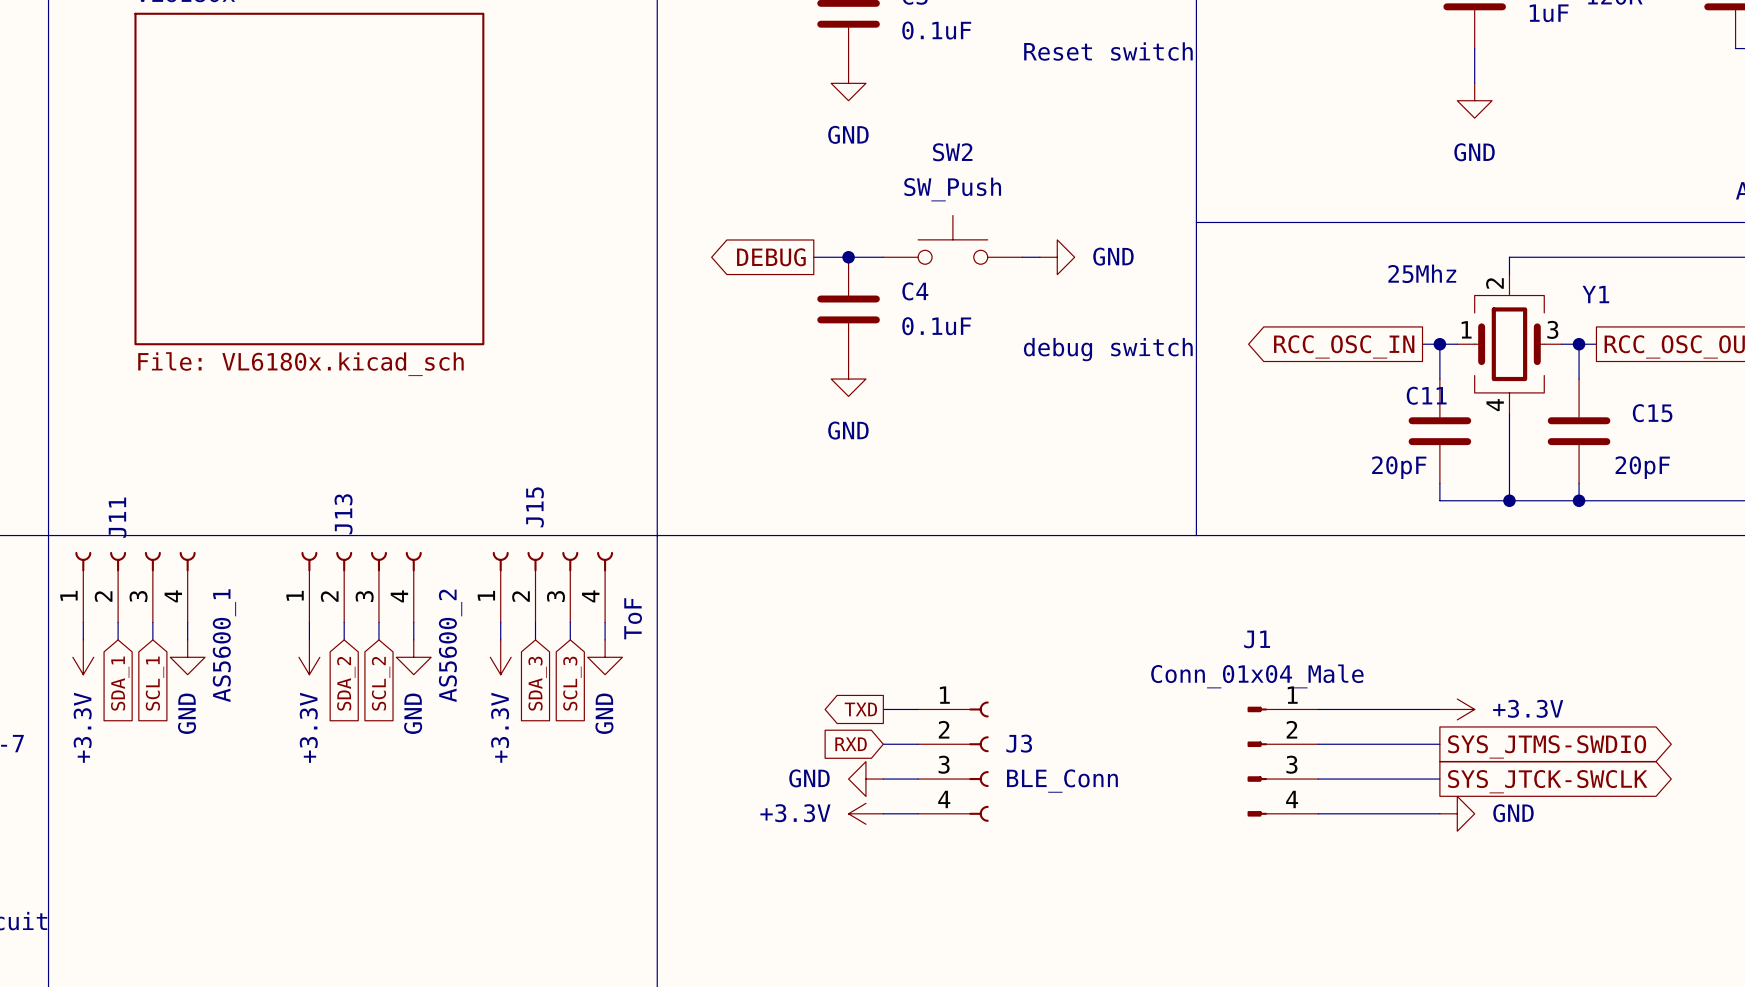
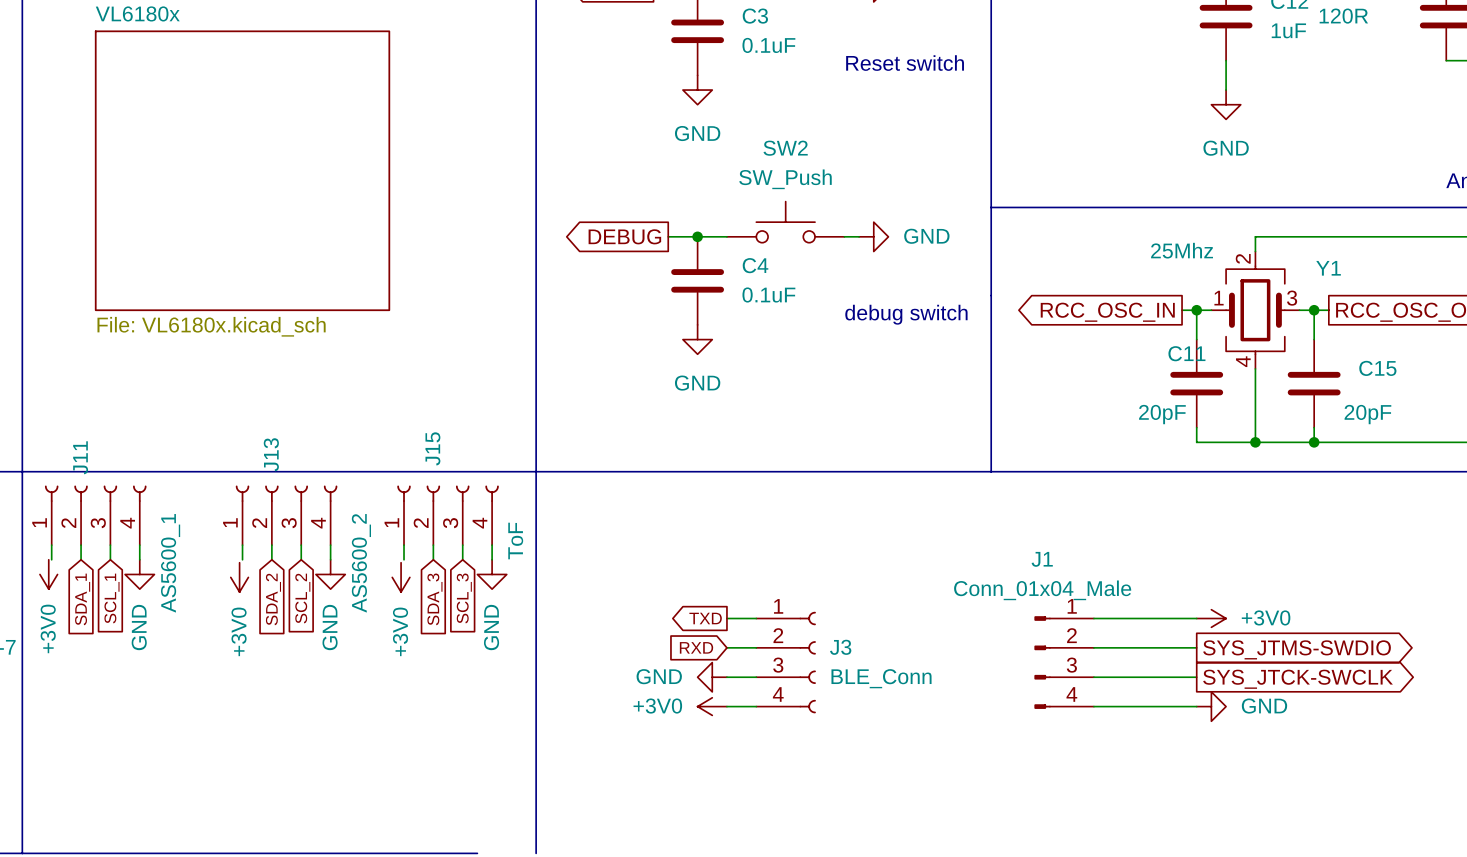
power symbol: +3.3V (83, 657) -> +3V0 (48, 574)
power symbol: +3.3V (309, 657) -> +3V0 (239, 577)
power symbol: +3.3V (500, 657) -> +3V0 (401, 577)
power symbol: +3.3V (1457, 709) -> +3V0 (1211, 618)
power symbol: +3.3V (865, 813) -> +3V0 (712, 706)

